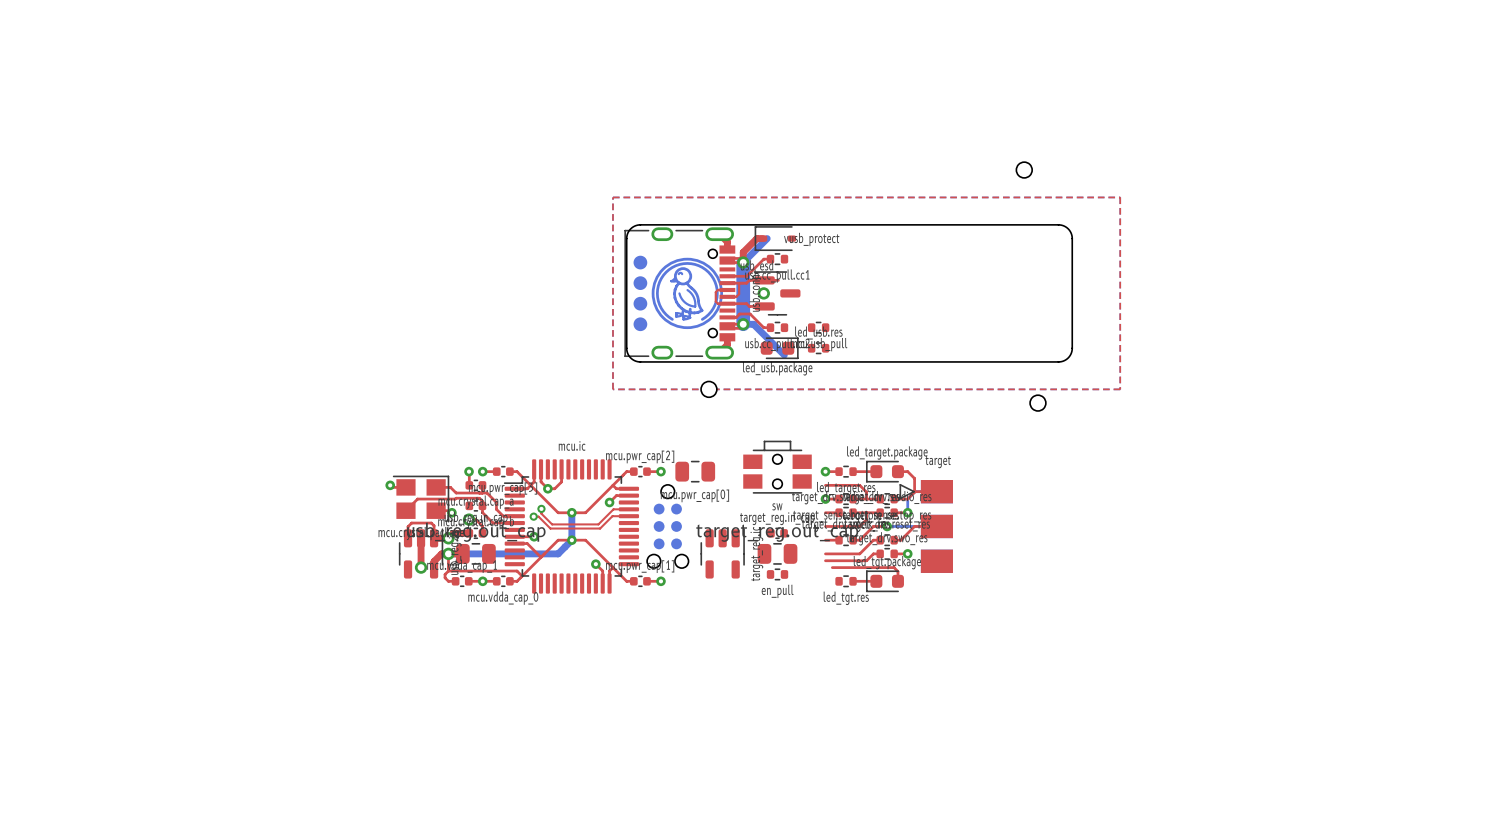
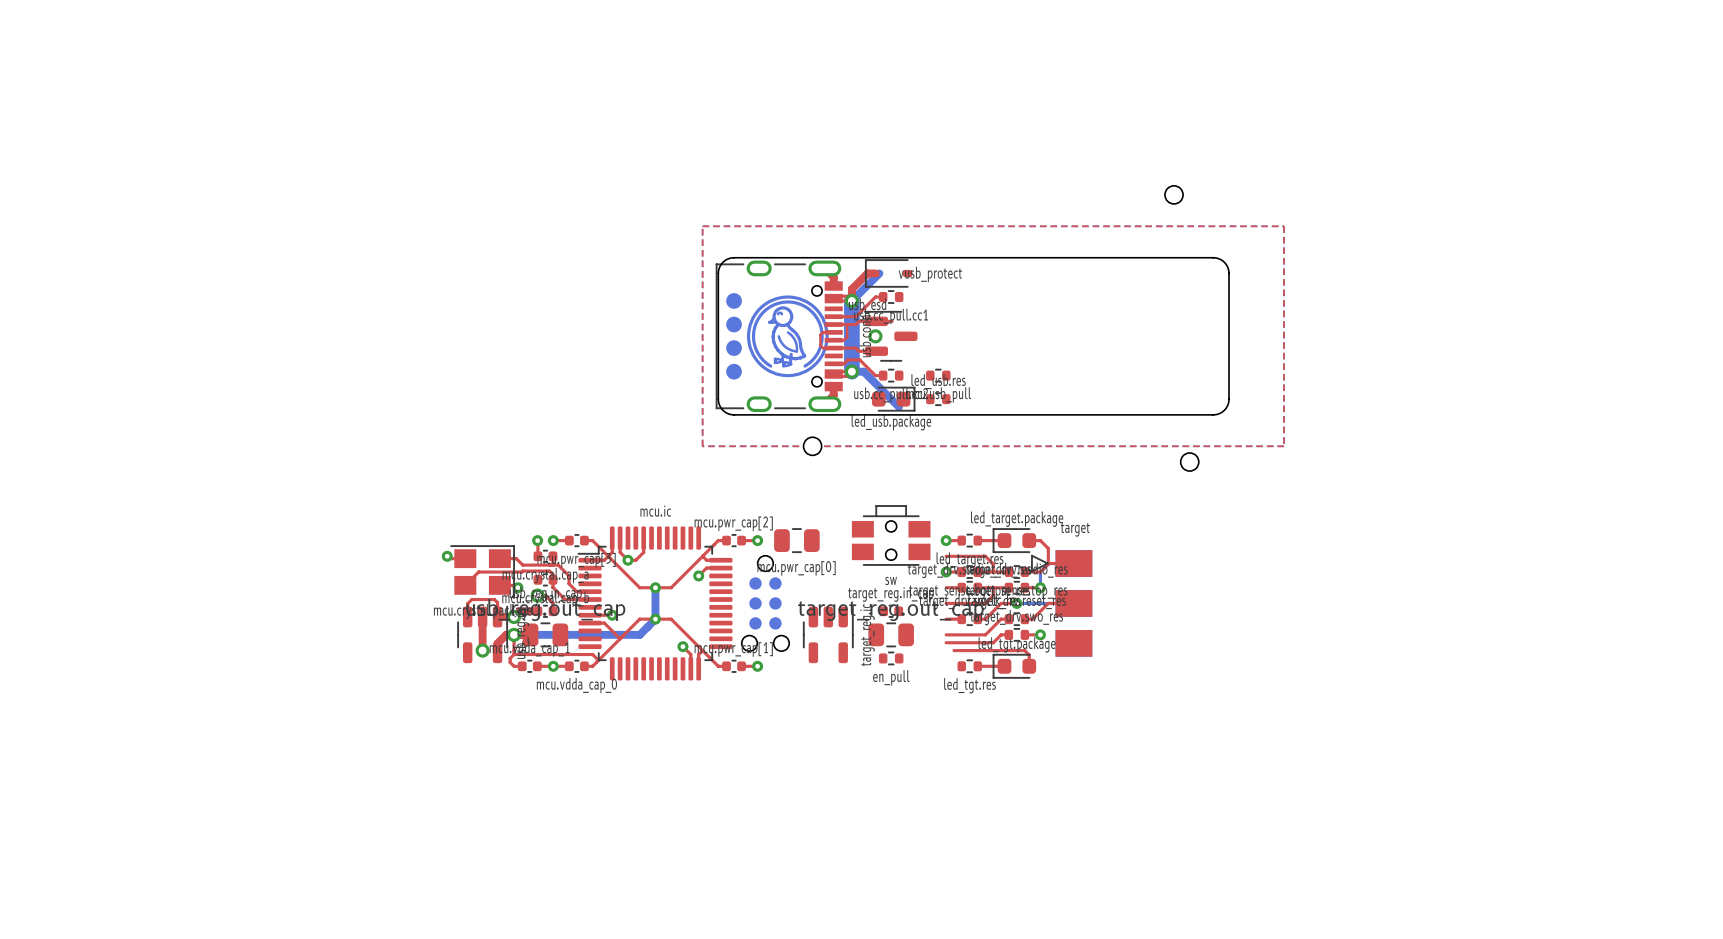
top track: (541, 508) (541, 513) (552, 524) (598, 524) (613, 509) (628, 509) -> none
via: (541, 508) -> none
via: (533, 516) -> none
top track: (628, 516) (612, 516) (600, 528) (550, 528) (538, 516) (533, 516) -> none

